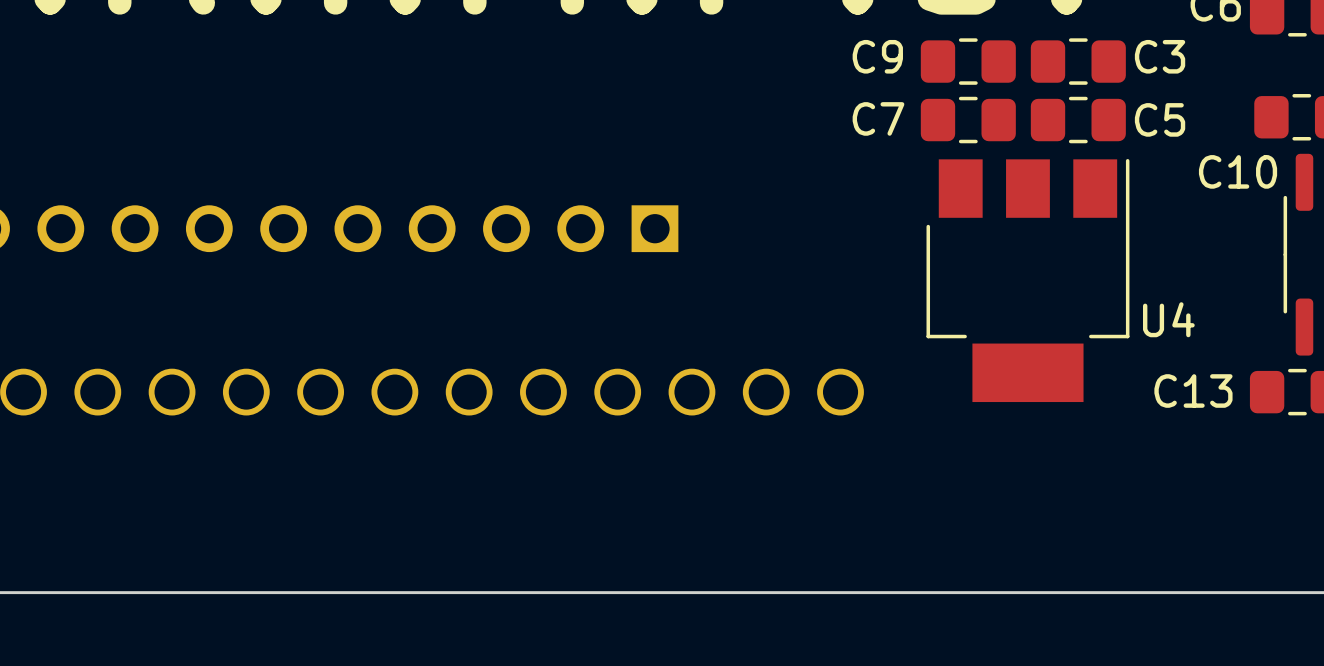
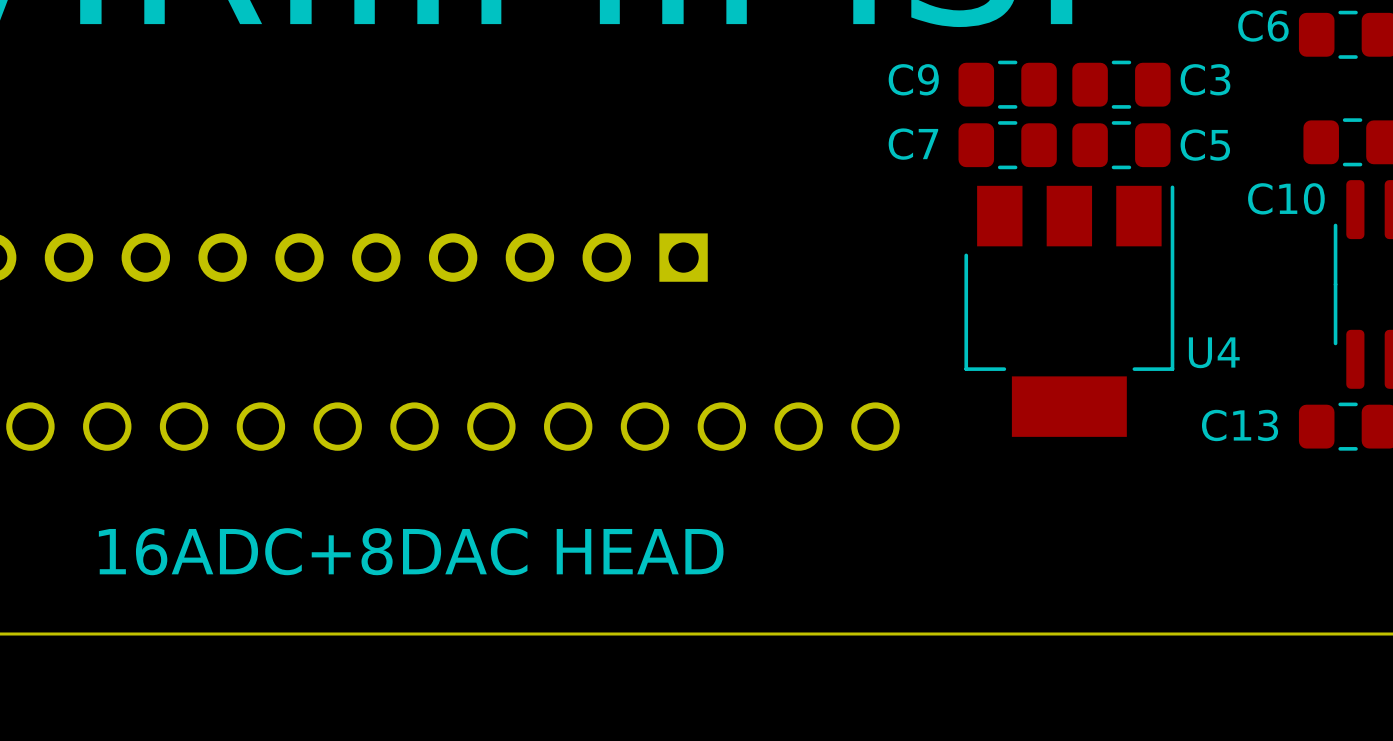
text: none -> 16ADC+8DAC HEAD (411, 551)

